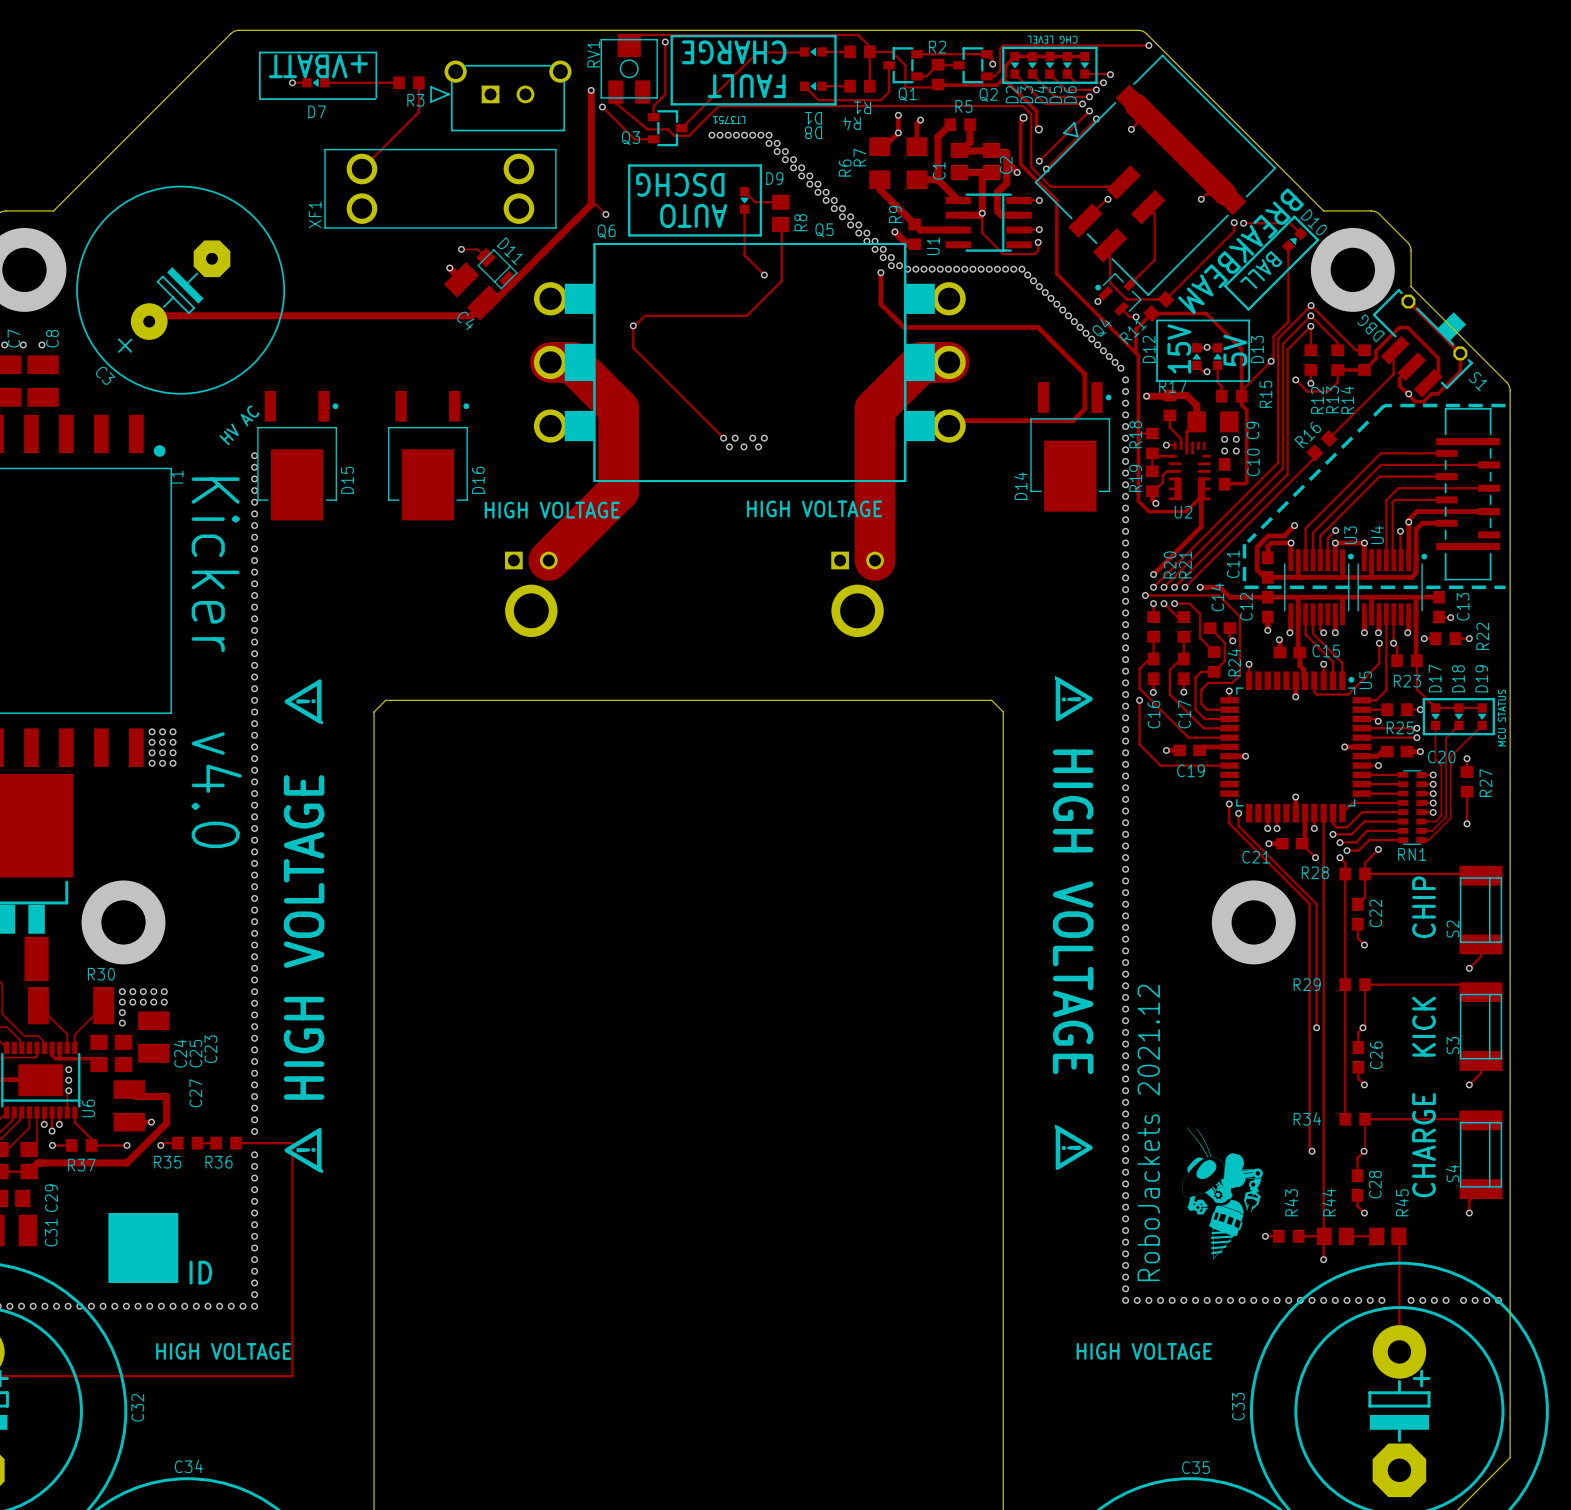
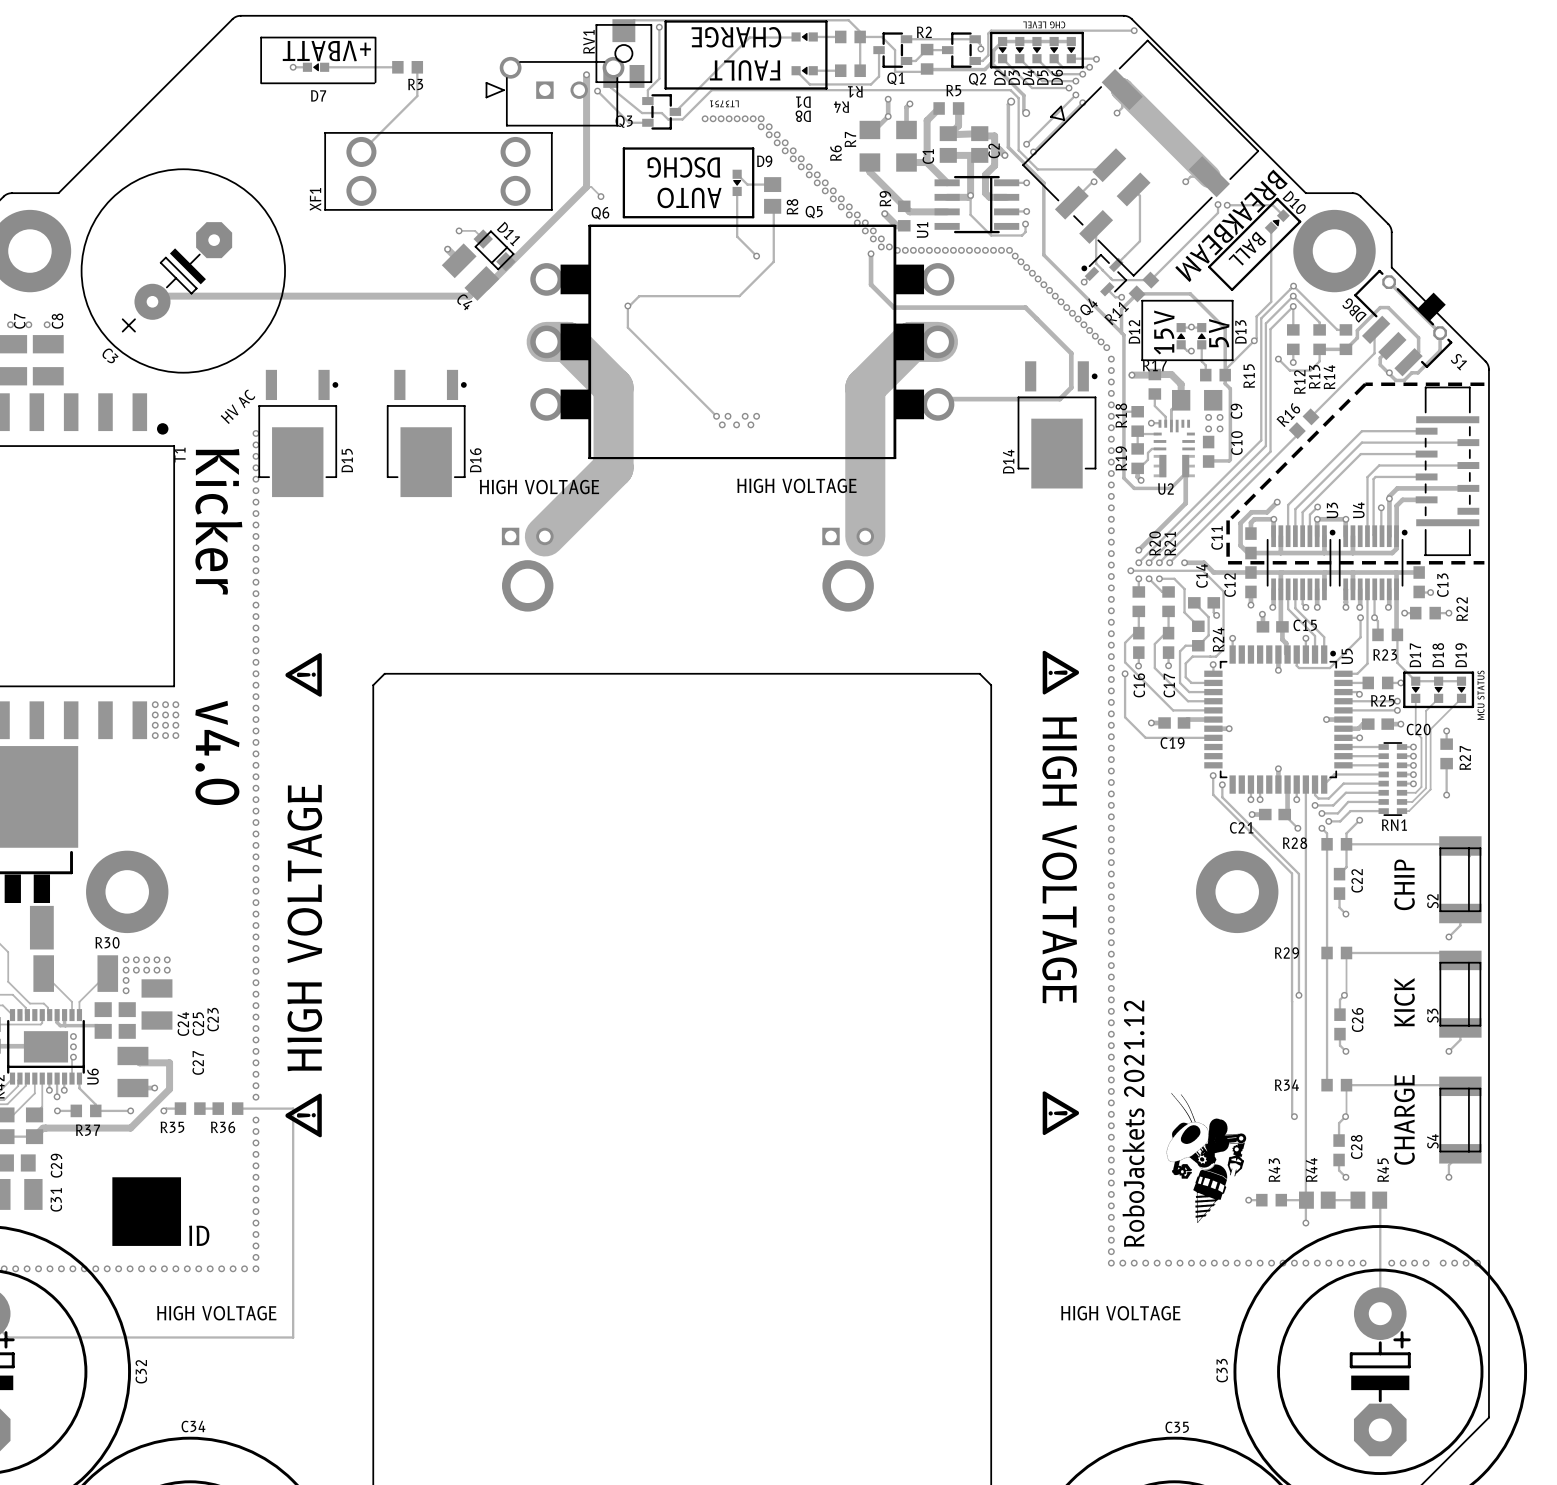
part position: (500, 95) -> (555, 91)

